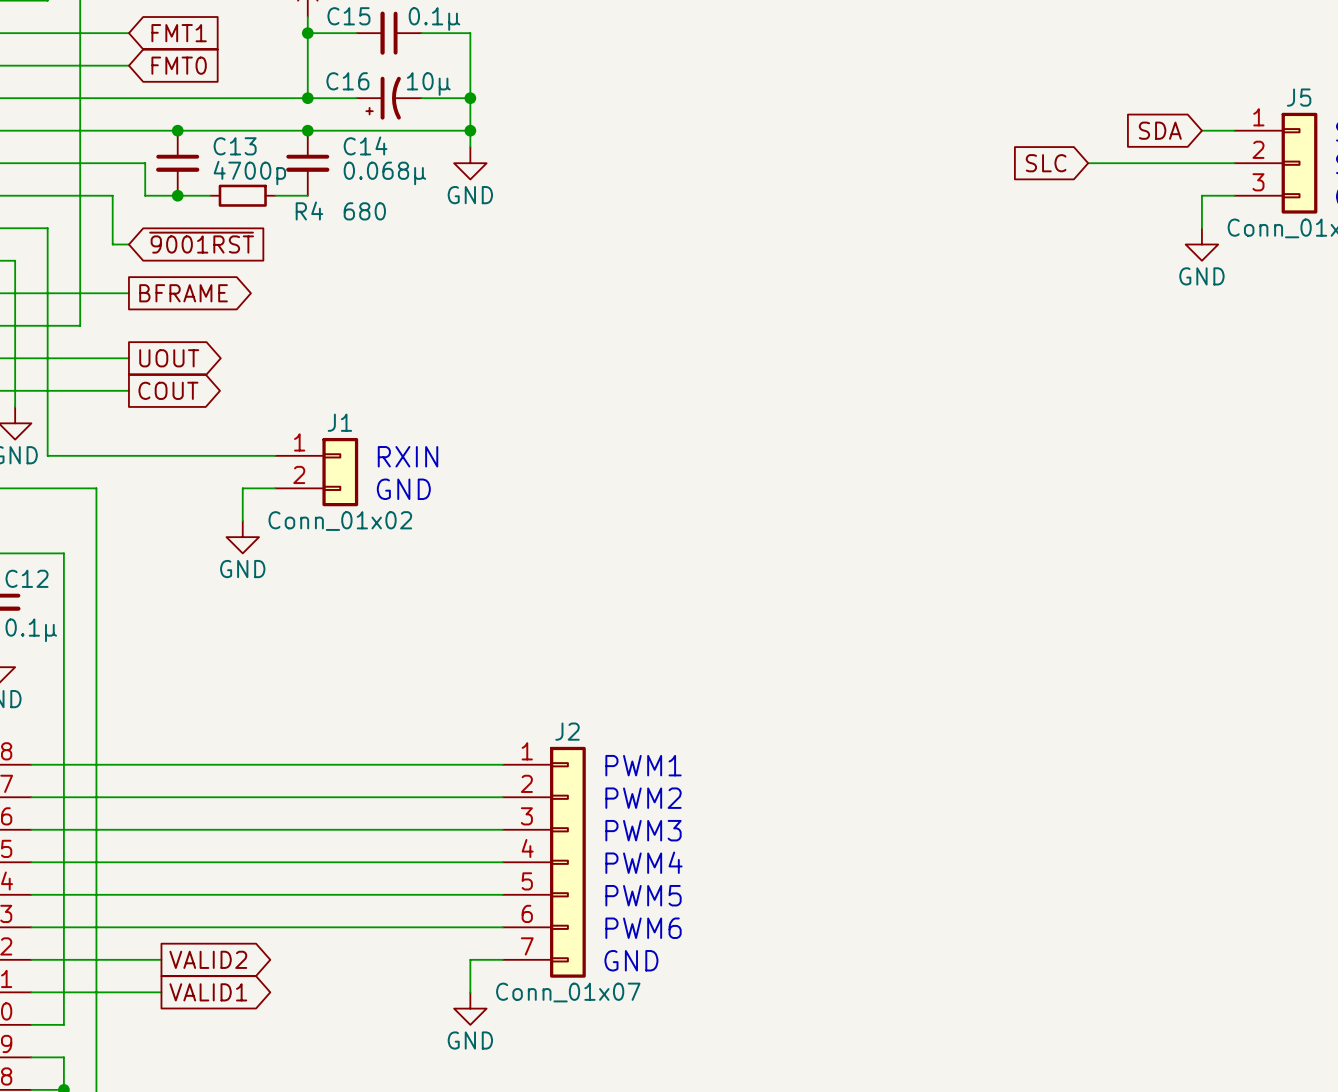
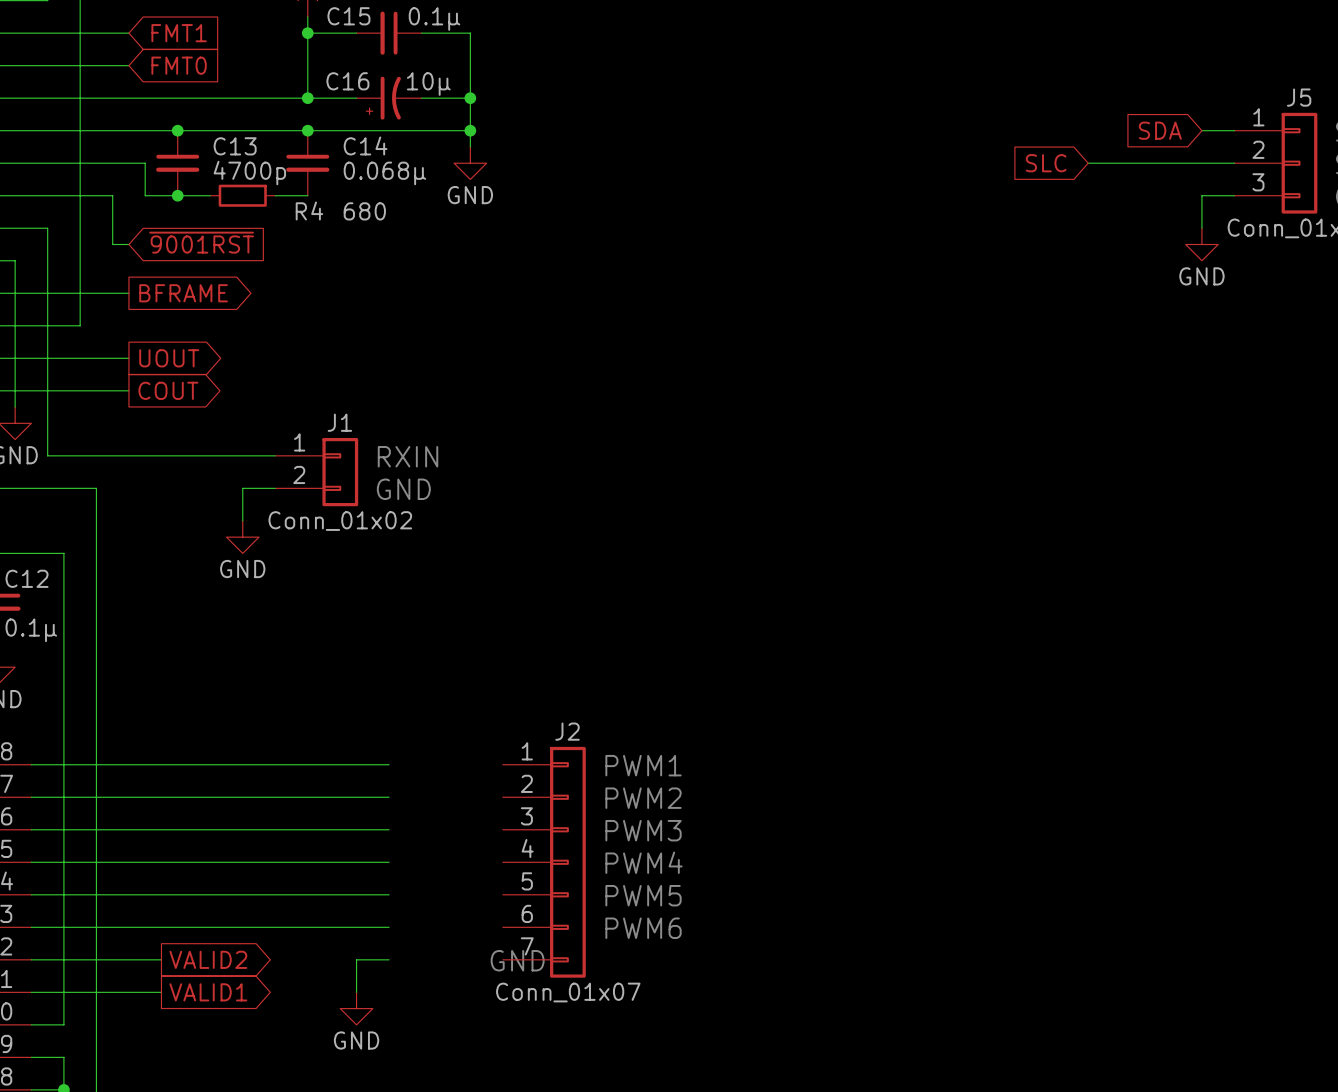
wire: (389, 764) (502, 764) -> none
wire: (389, 797) (502, 797) -> none
wire: (389, 829) (502, 829) -> none
wire: (389, 862) (502, 862) -> none
wire: (389, 894) (502, 894) -> none
wire: (389, 927) (502, 927) -> none
wire: (502, 959) (470, 959) (470, 992) -> (389, 959) (356, 959) (356, 992)
text position: GND (631, 960) -> GND (517, 960)
power symbol: none -> GND (356, 1008)
power symbol: GND (470, 1008) -> none

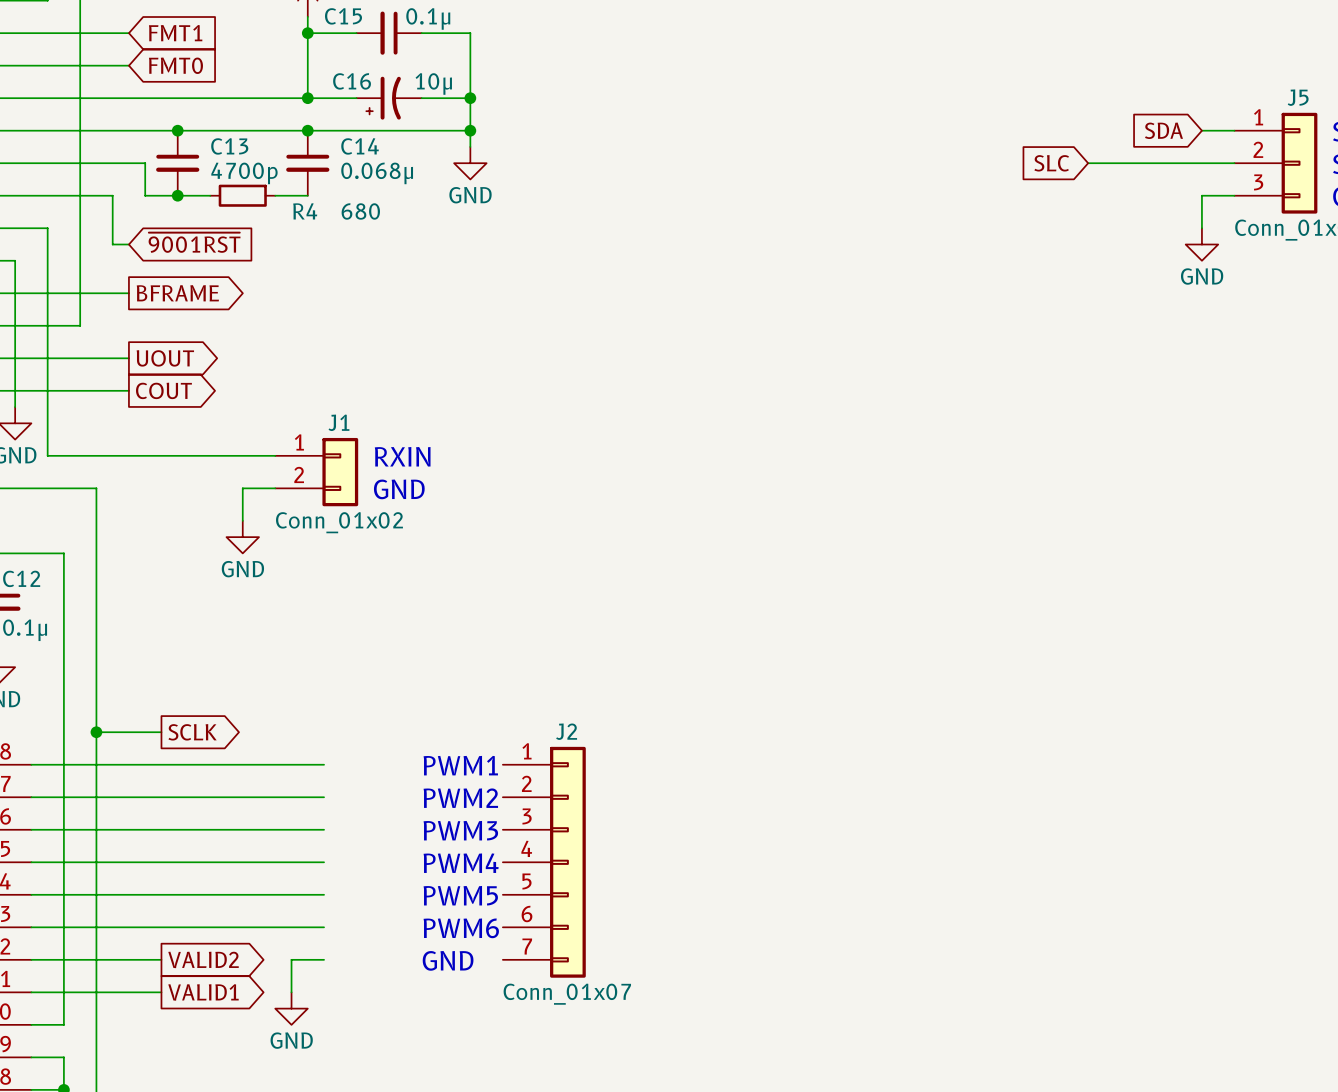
junction: none -> (96, 732)
global label: none -> SCLK (192, 732)
wire: (324, 764) (389, 764) -> (96, 732) (161, 732)
text position: PWM1 (643, 765) -> PWM1 (460, 765)
wire: (324, 797) (389, 797) -> none
text position: PWM2 (643, 798) -> PWM2 (460, 798)
wire: (324, 829) (389, 829) -> none
text position: PWM3 (643, 830) -> PWM3 (460, 830)
wire: (324, 862) (389, 862) -> none
text position: PWM4 (643, 862) -> PWM4 (461, 863)
wire: (324, 894) (389, 894) -> none
text position: PWM5 (643, 895) -> PWM5 (460, 895)
wire: (324, 927) (389, 927) -> none
text position: PWM6 (643, 928) -> PWM6 (461, 928)
wire: (389, 959) (356, 959) (356, 992) -> (324, 959) (291, 959) (291, 992)
text position: GND (517, 960) -> GND (448, 960)
power symbol position: GND (356, 1008) -> GND (291, 1008)

